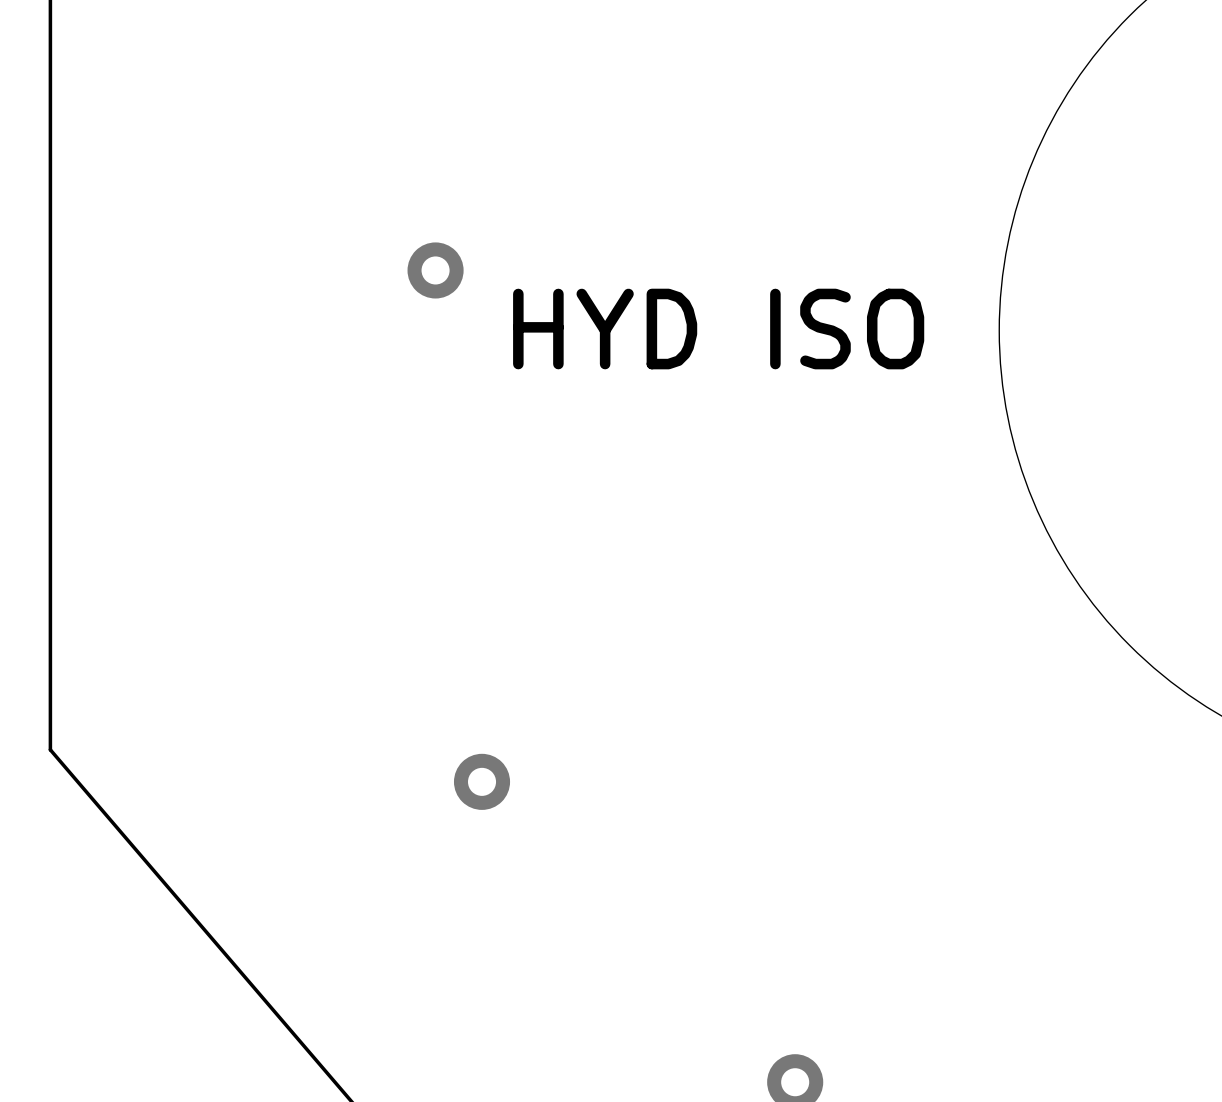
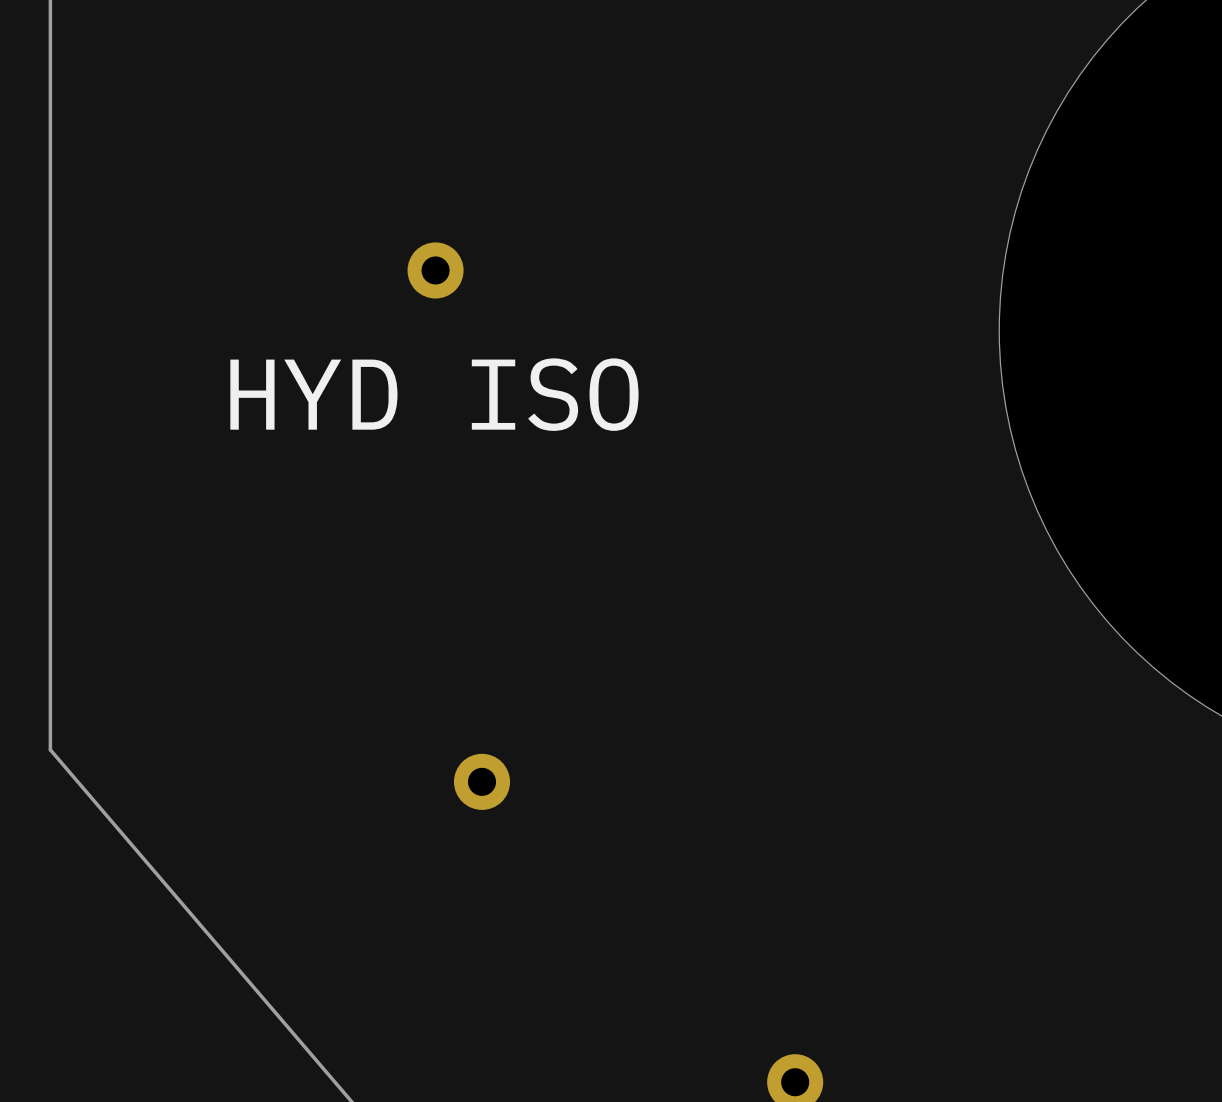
text position: HYD ISO (718, 329) -> HYD ISO (434, 394)

